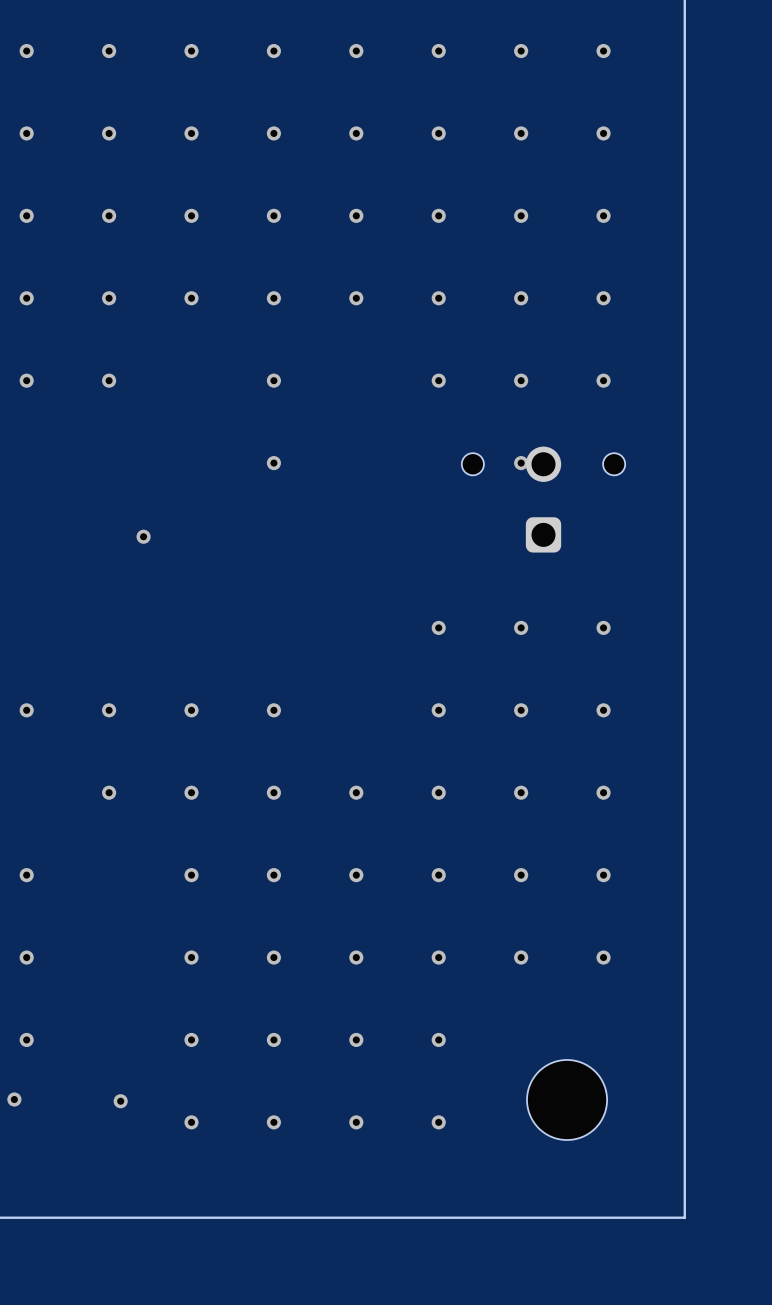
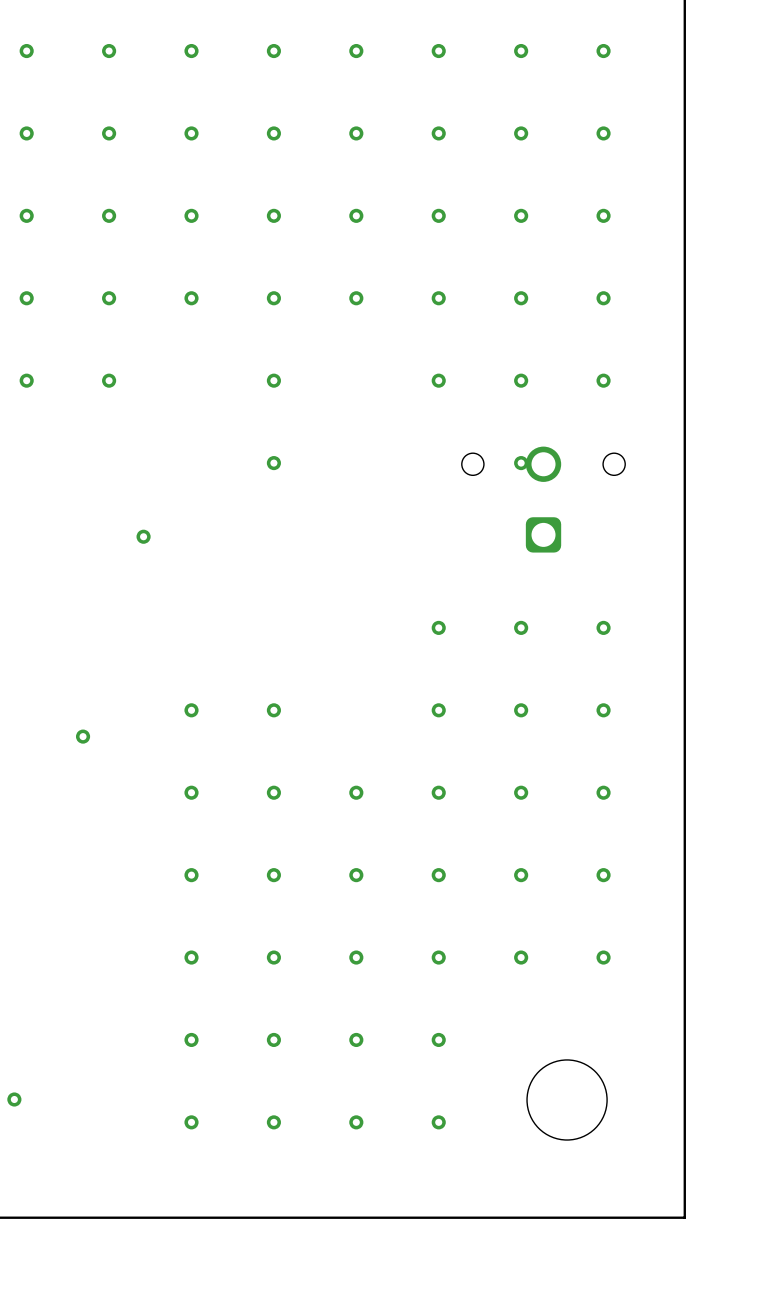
via: (26, 710) -> none
via: (109, 710) -> none
via: none -> (83, 736)
via: (109, 792) -> none
via: (26, 875) -> none
via: (26, 957) -> none
via: (26, 1039) -> none
via: (120, 1101) -> none

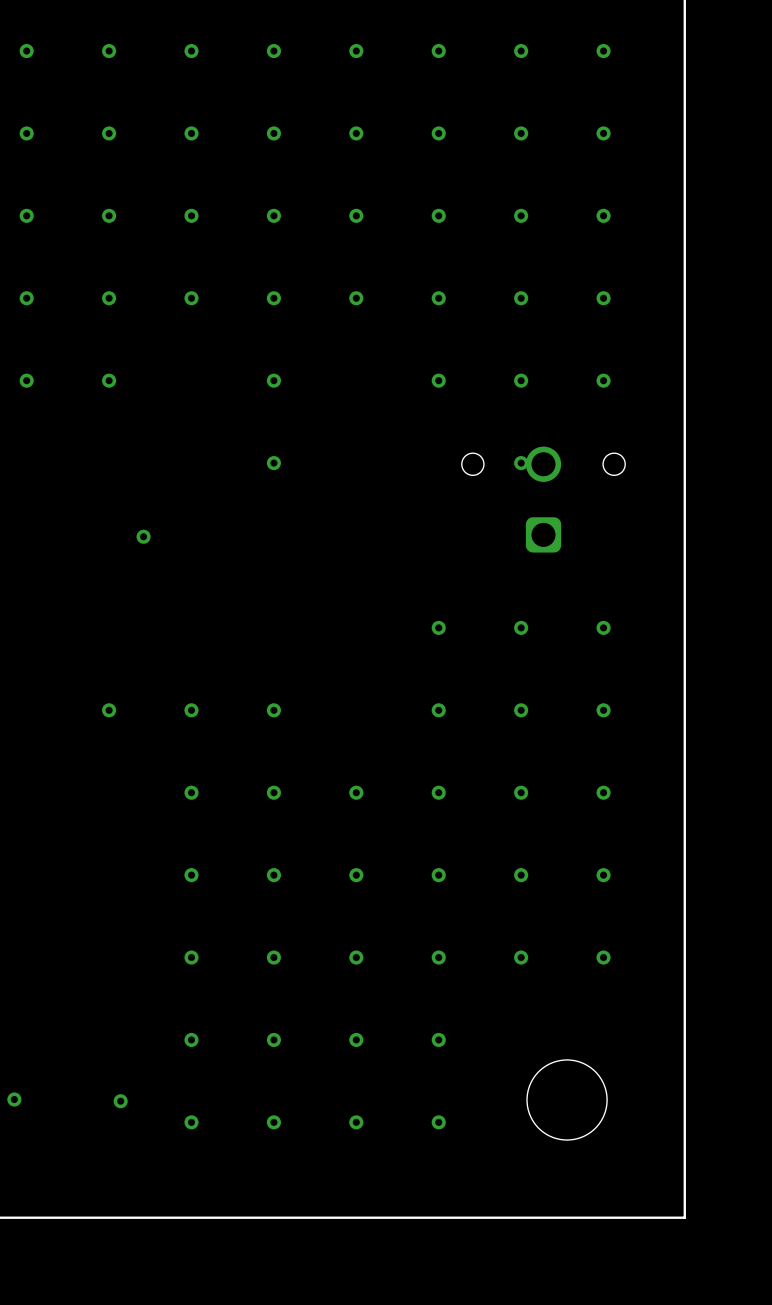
via position: (83, 736) -> (109, 710)
via: none -> (120, 1101)

